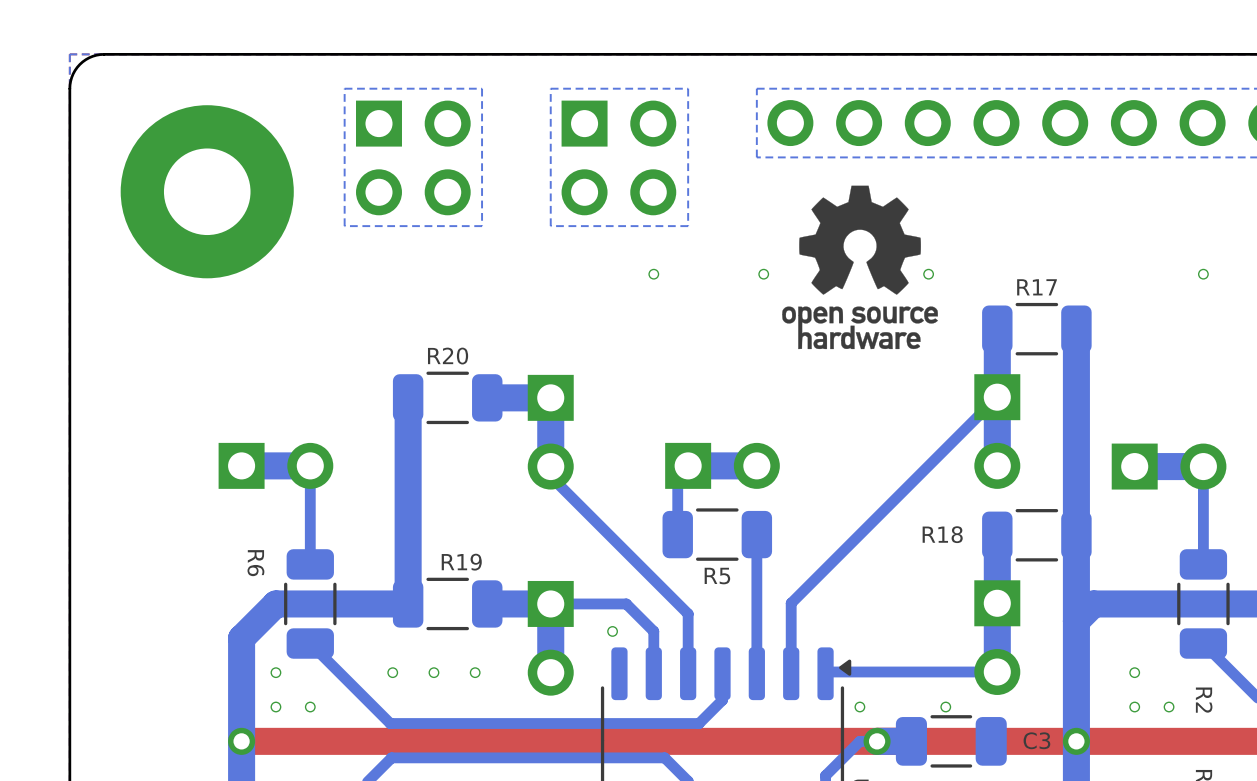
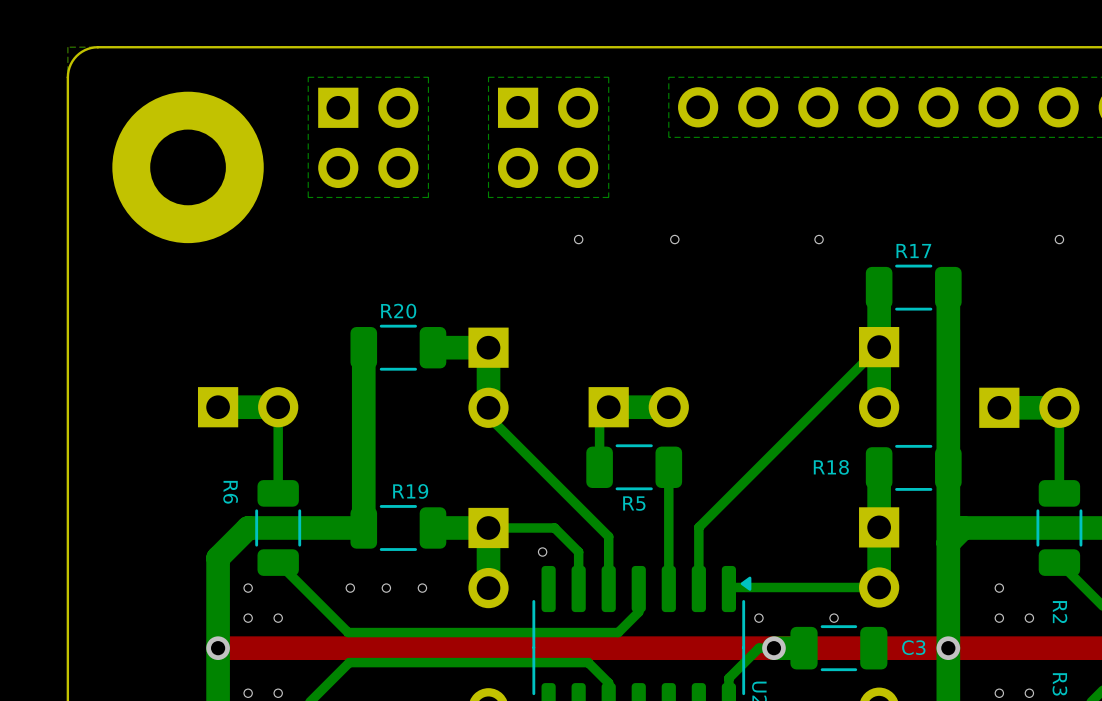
drawing: [782, 185, 938, 350] -> none

